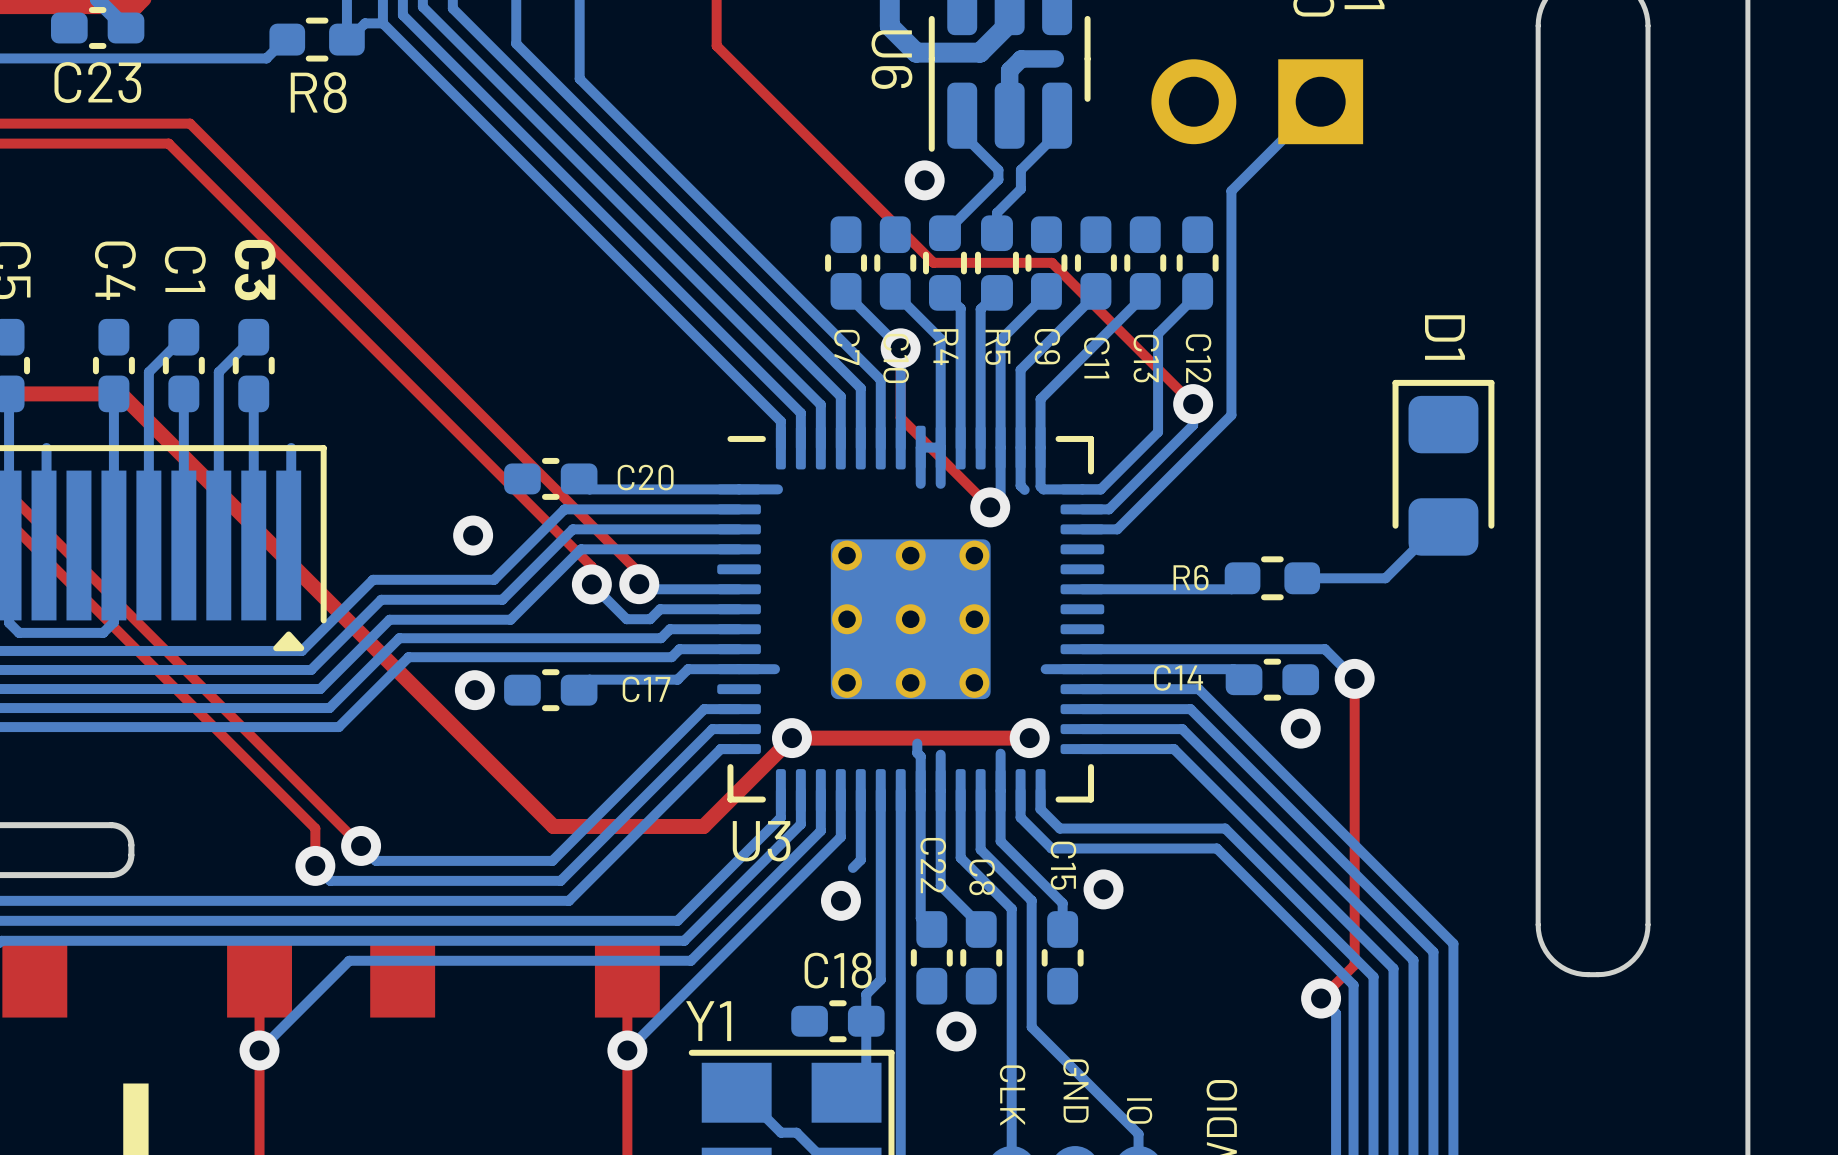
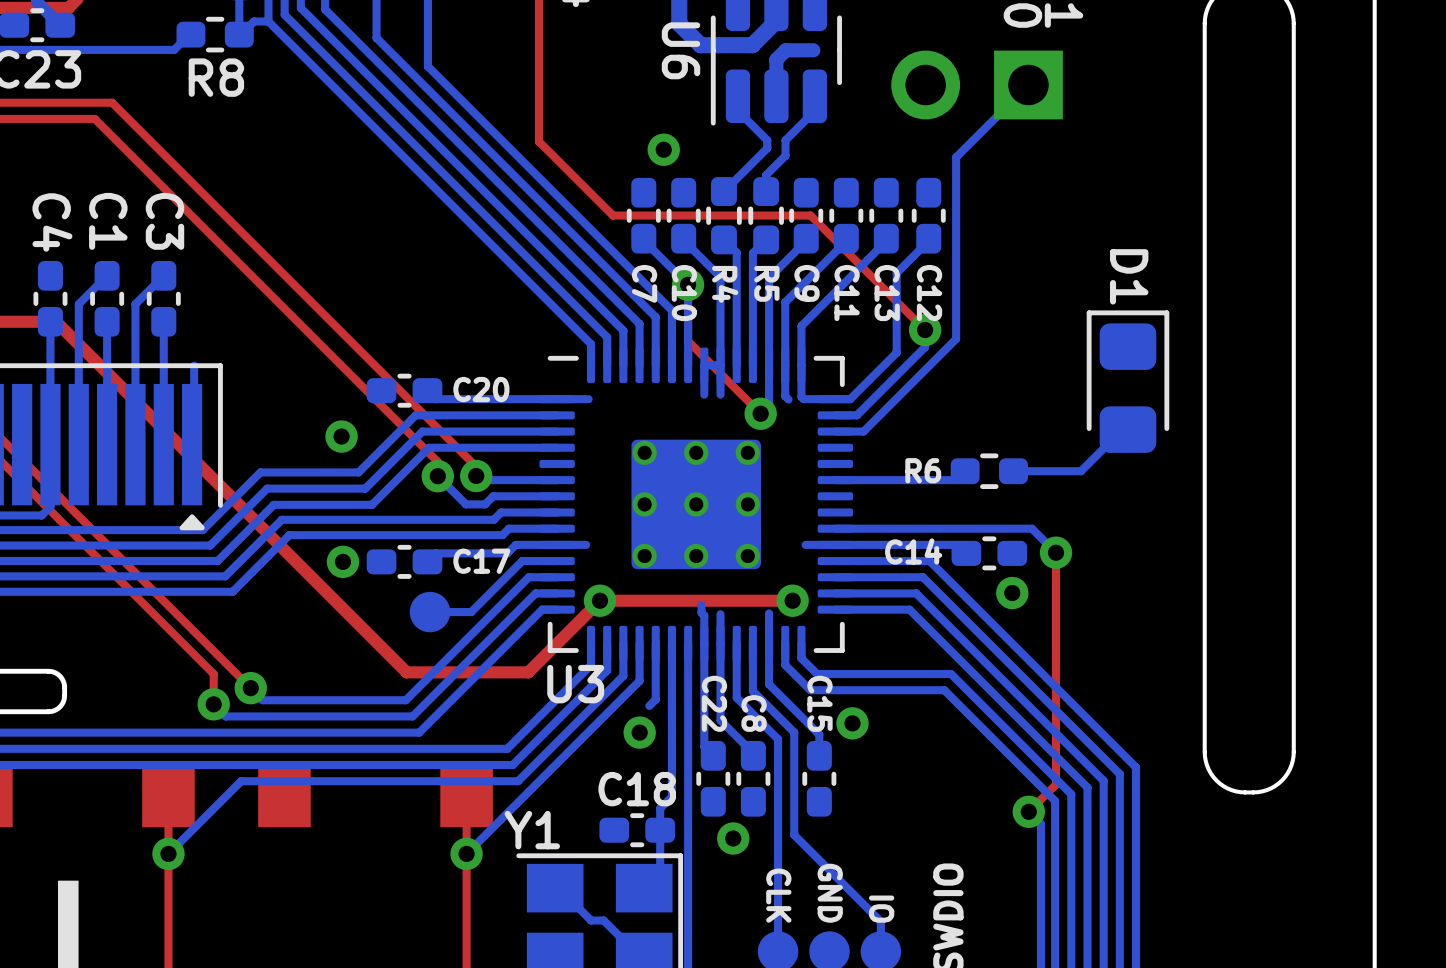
top track: (716, 45) (933, 262) -> (538, 39) (538, 141) (612, 215) (714, 215)
via position: (924, 180) -> (663, 149)
bottom track: none -> (557, 561) (522, 561) (471, 612) (430, 612)
part: none -> (430, 612)

